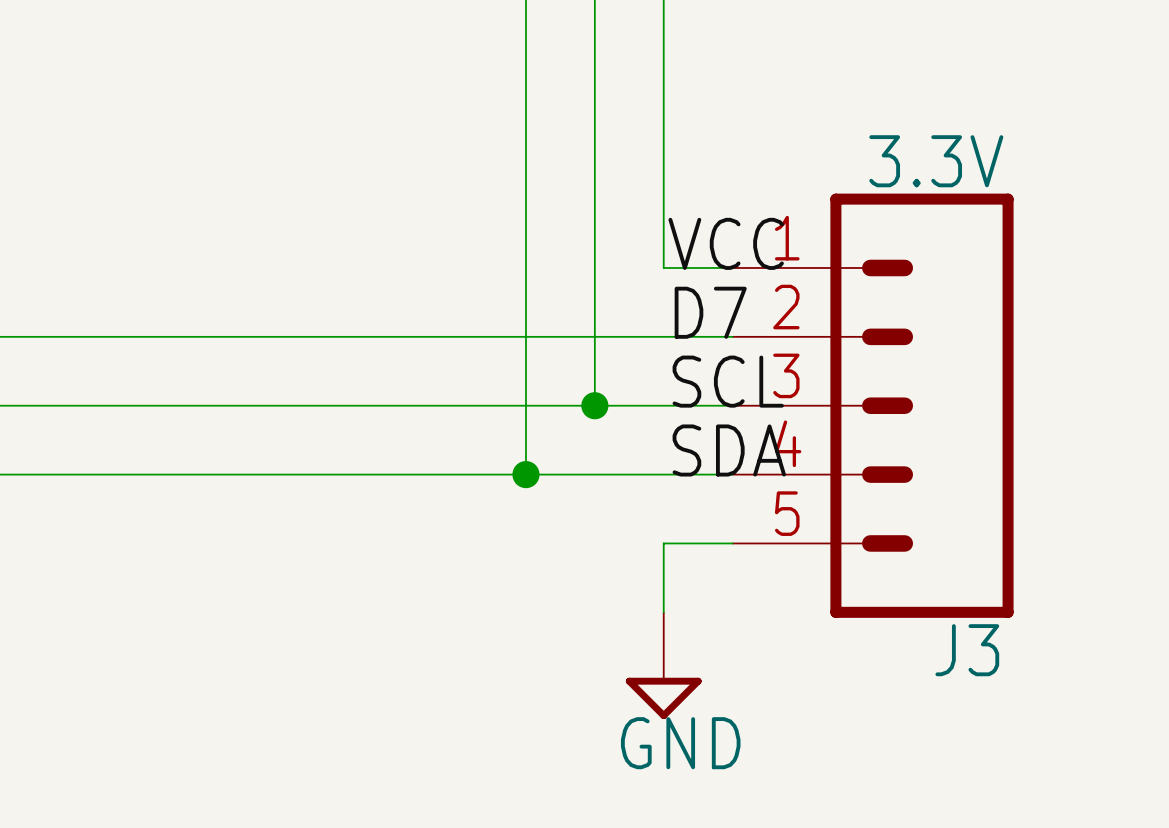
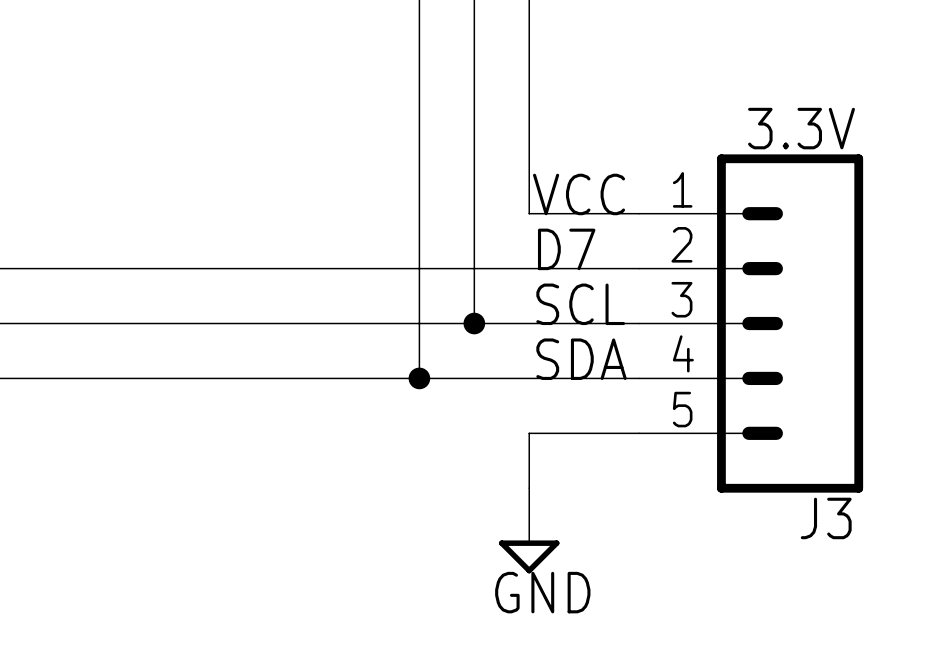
J3 position: (873, 405) -> (751, 323)

